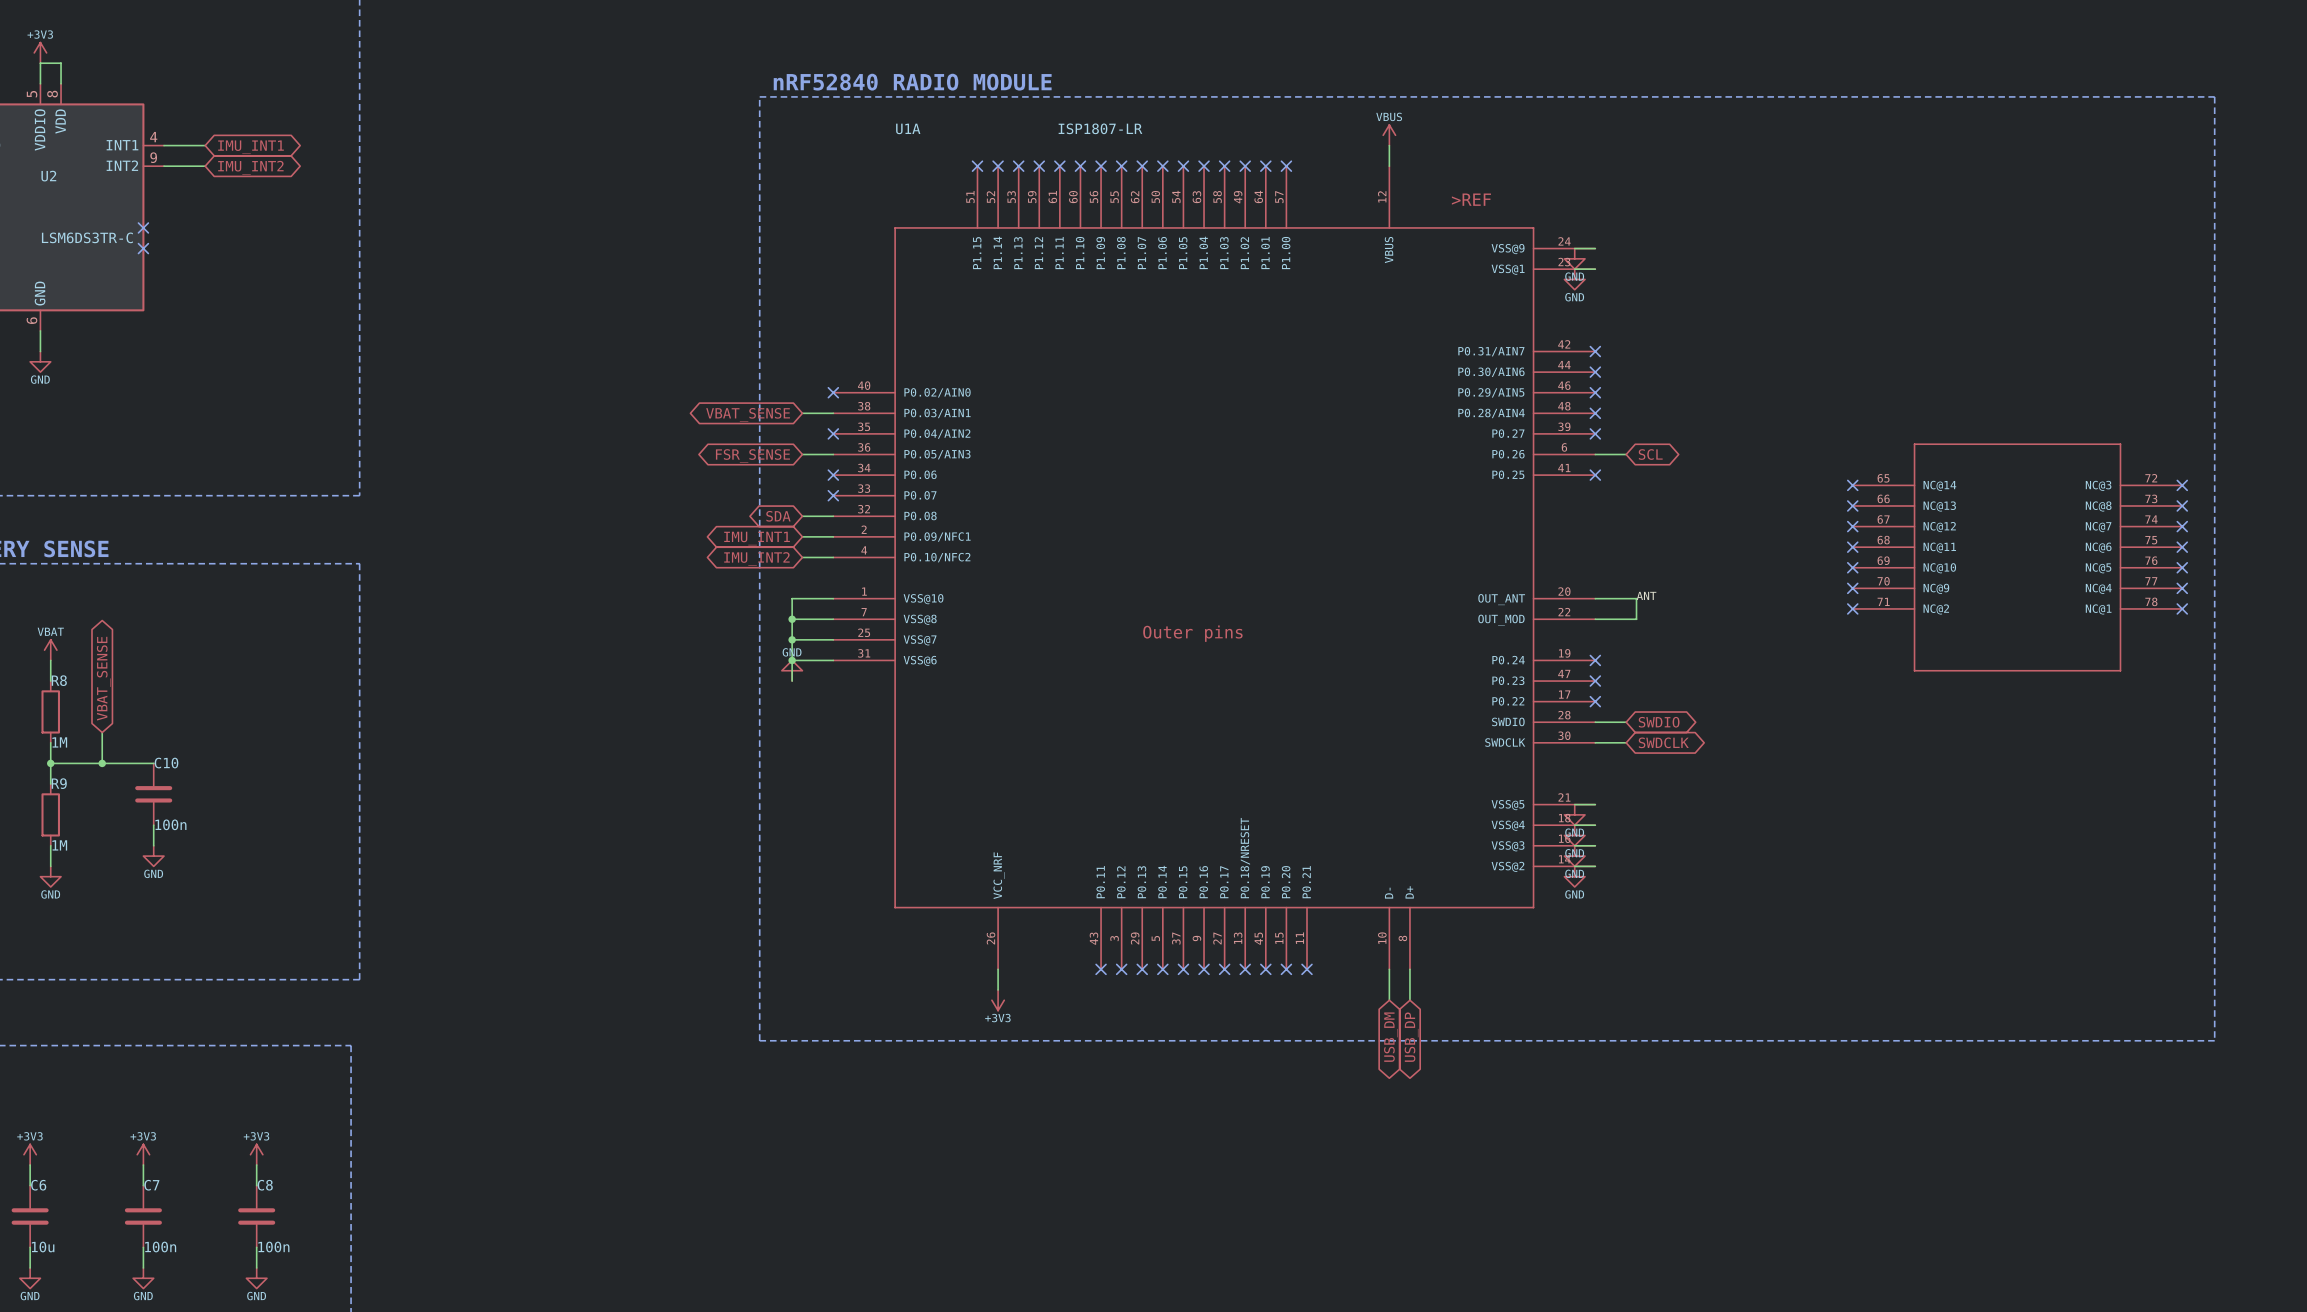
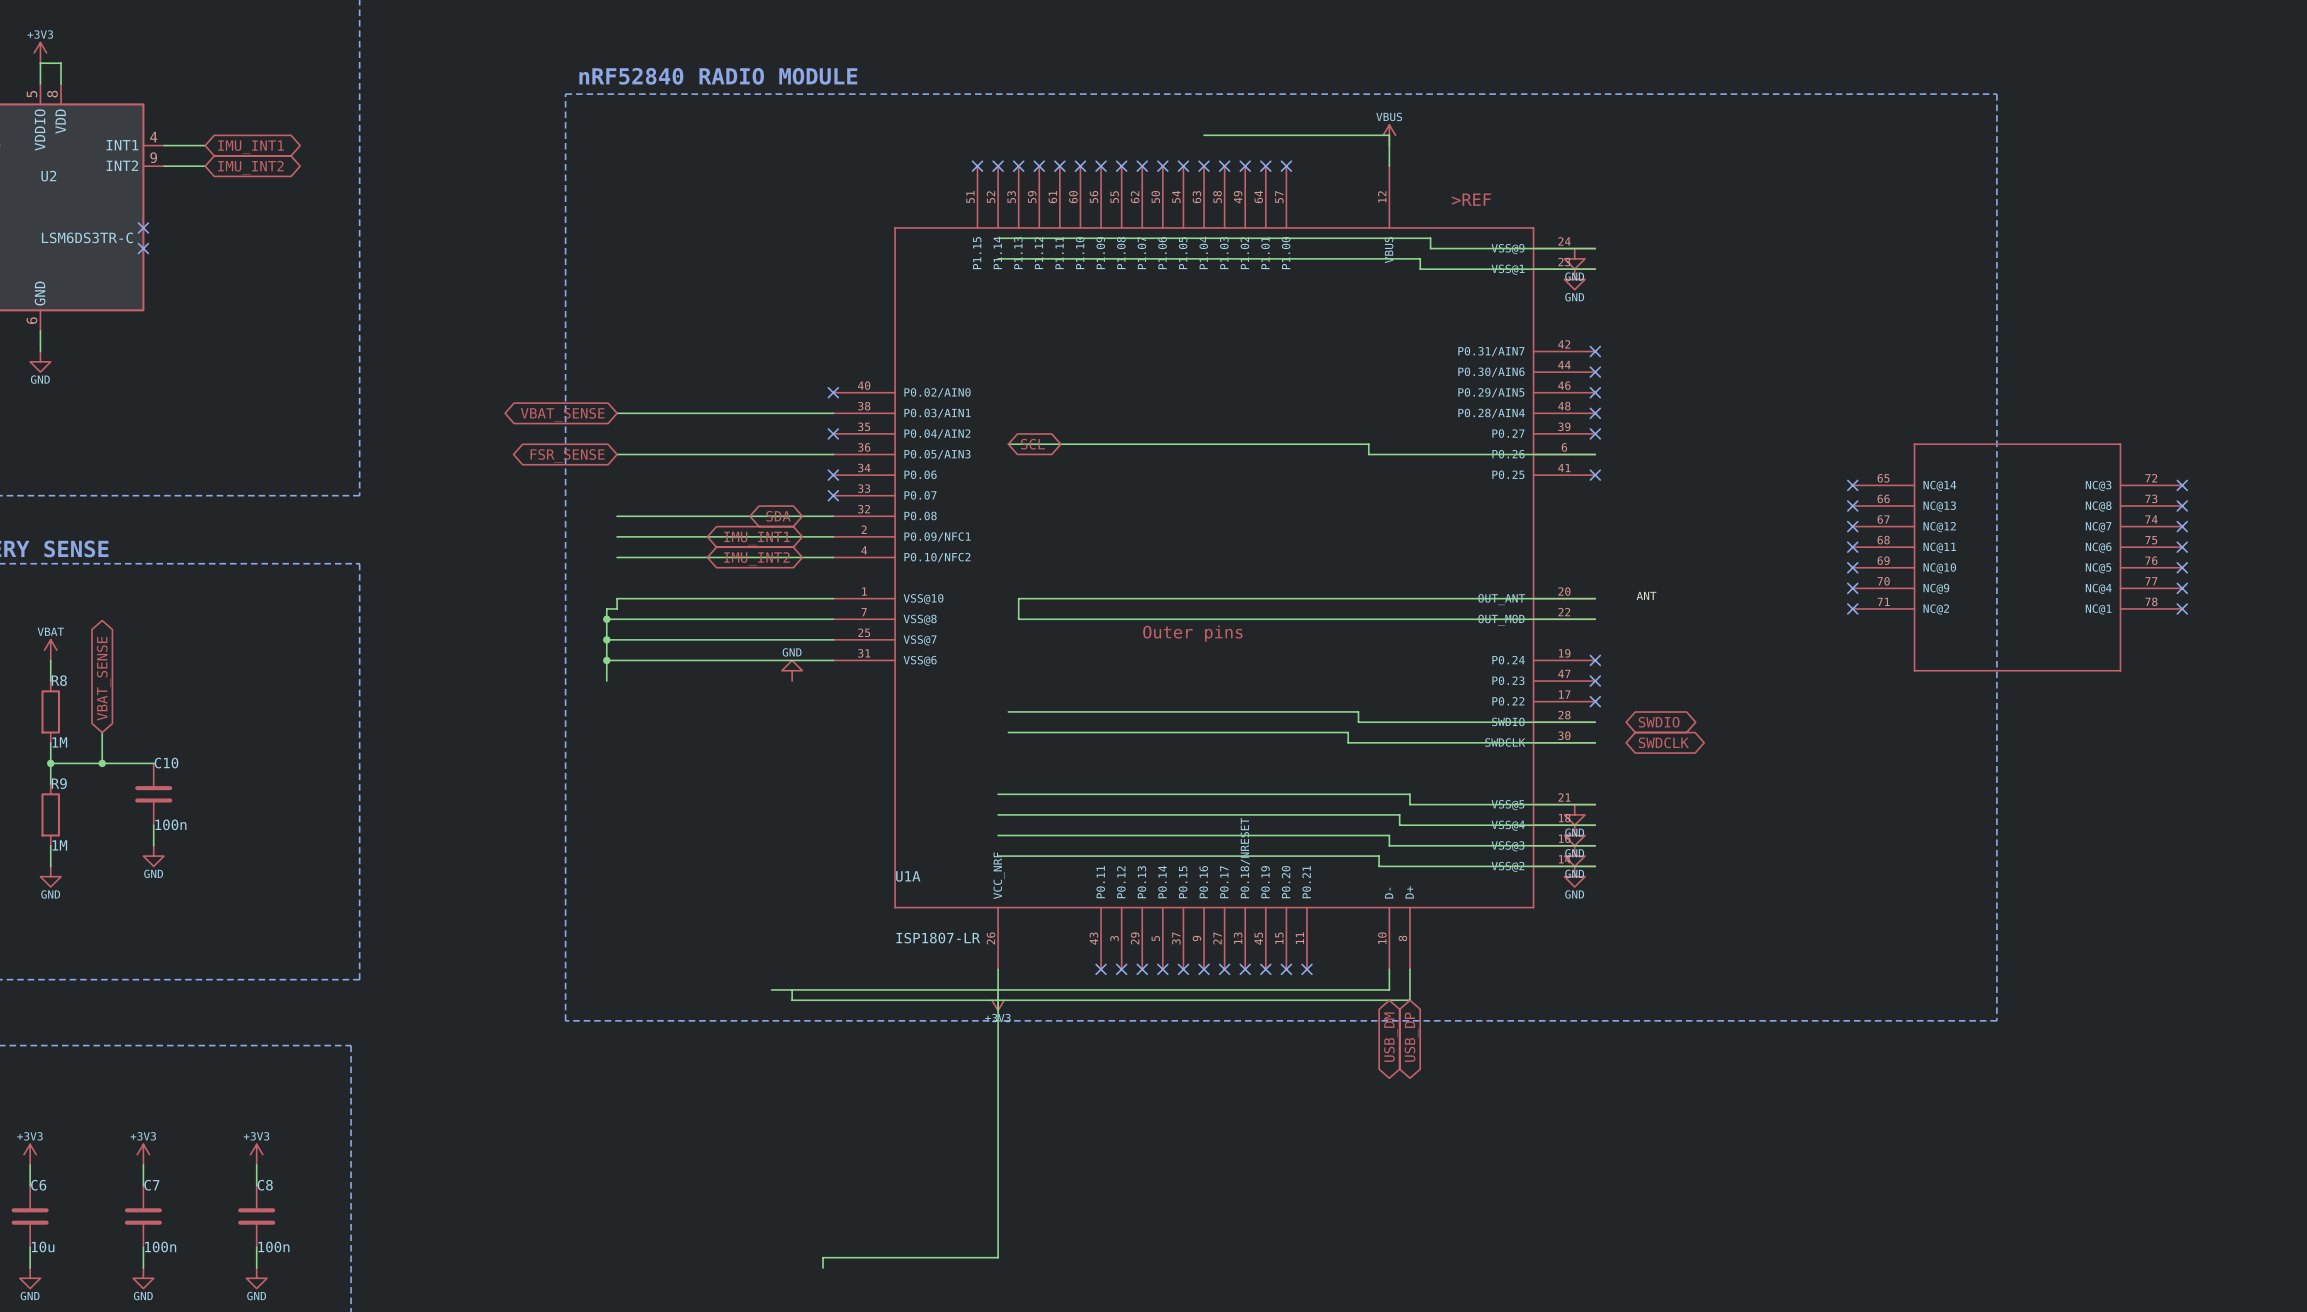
text position: nRF52840 RADIO MODULE (912, 82) -> nRF52840 RADIO MODULE (718, 76)
line: (759, 96) (2214, 96) (2214, 1040) (759, 1040) (759, 96) -> (565, 94) (565, 1020) (1996, 1020) (1996, 94) (565, 94)
U1A name position: U1A (908, 128) -> U1A (908, 876)
U1A value position: ISP1807-LR (1100, 128) -> ISP1807-LR (938, 938)
wire: none -> (1204, 135) (1389, 135) (1389, 145)
wire: none -> (998, 238) (1430, 238) (1430, 248) (1574, 248)
wire: none -> (998, 258) (1420, 258) (1420, 269) (1574, 269)
wire: none -> (617, 413) (802, 413)
global label position: VBAT_SENSE (748, 414) -> VBAT_SENSE (562, 414)
global label: none -> SCL (1032, 444)
wire: none -> (617, 454) (802, 454)
wire: (1595, 454) (1626, 454) -> (1595, 454) (1368, 454) (1368, 444) (1008, 444)
global label: SCL (1650, 454) -> none
global label position: FSR_SENSE (752, 456) -> FSR_SENSE (567, 456)
wire: none -> (617, 516) (802, 516)
wire: none -> (617, 536) (802, 536)
wire: none -> (617, 557) (802, 557)
wire: (792, 598) (792, 681) -> (792, 598) (617, 598) (617, 608) (606, 608) (606, 681)
wire: (1595, 598) (1636, 598) (1636, 619) (1595, 619) -> (1595, 598) (1018, 598) (1018, 619) (1595, 619)
wire: none -> (606, 619) (792, 619)
junction: none -> (606, 619)
junction: (792, 619) -> none
wire: none -> (606, 639) (792, 639)
junction: none -> (606, 639)
junction: (792, 639) -> none
wire: none -> (606, 660) (792, 660)
junction: none -> (606, 660)
junction: (792, 660) -> none
wire: (1595, 722) (1626, 722) -> (1595, 722) (1358, 722) (1358, 711) (1008, 711)
wire: (1595, 742) (1626, 742) -> (1595, 742) (1348, 742) (1348, 732) (1008, 732)
wire: none -> (998, 794) (1409, 794) (1409, 804) (1574, 804)
wire: none -> (998, 814) (1399, 814) (1399, 825) (1574, 825)
wire: none -> (998, 835) (1389, 835) (1389, 845) (1574, 845)
wire: none -> (998, 856) (1379, 856) (1379, 866) (1574, 866)
wire: none -> (792, 989) (792, 1000) (1409, 1000)
wire: none -> (998, 989) (998, 1257) (823, 1257) (823, 1267)
wire: (1389, 989) (1389, 1000) -> (1389, 989) (771, 989)

